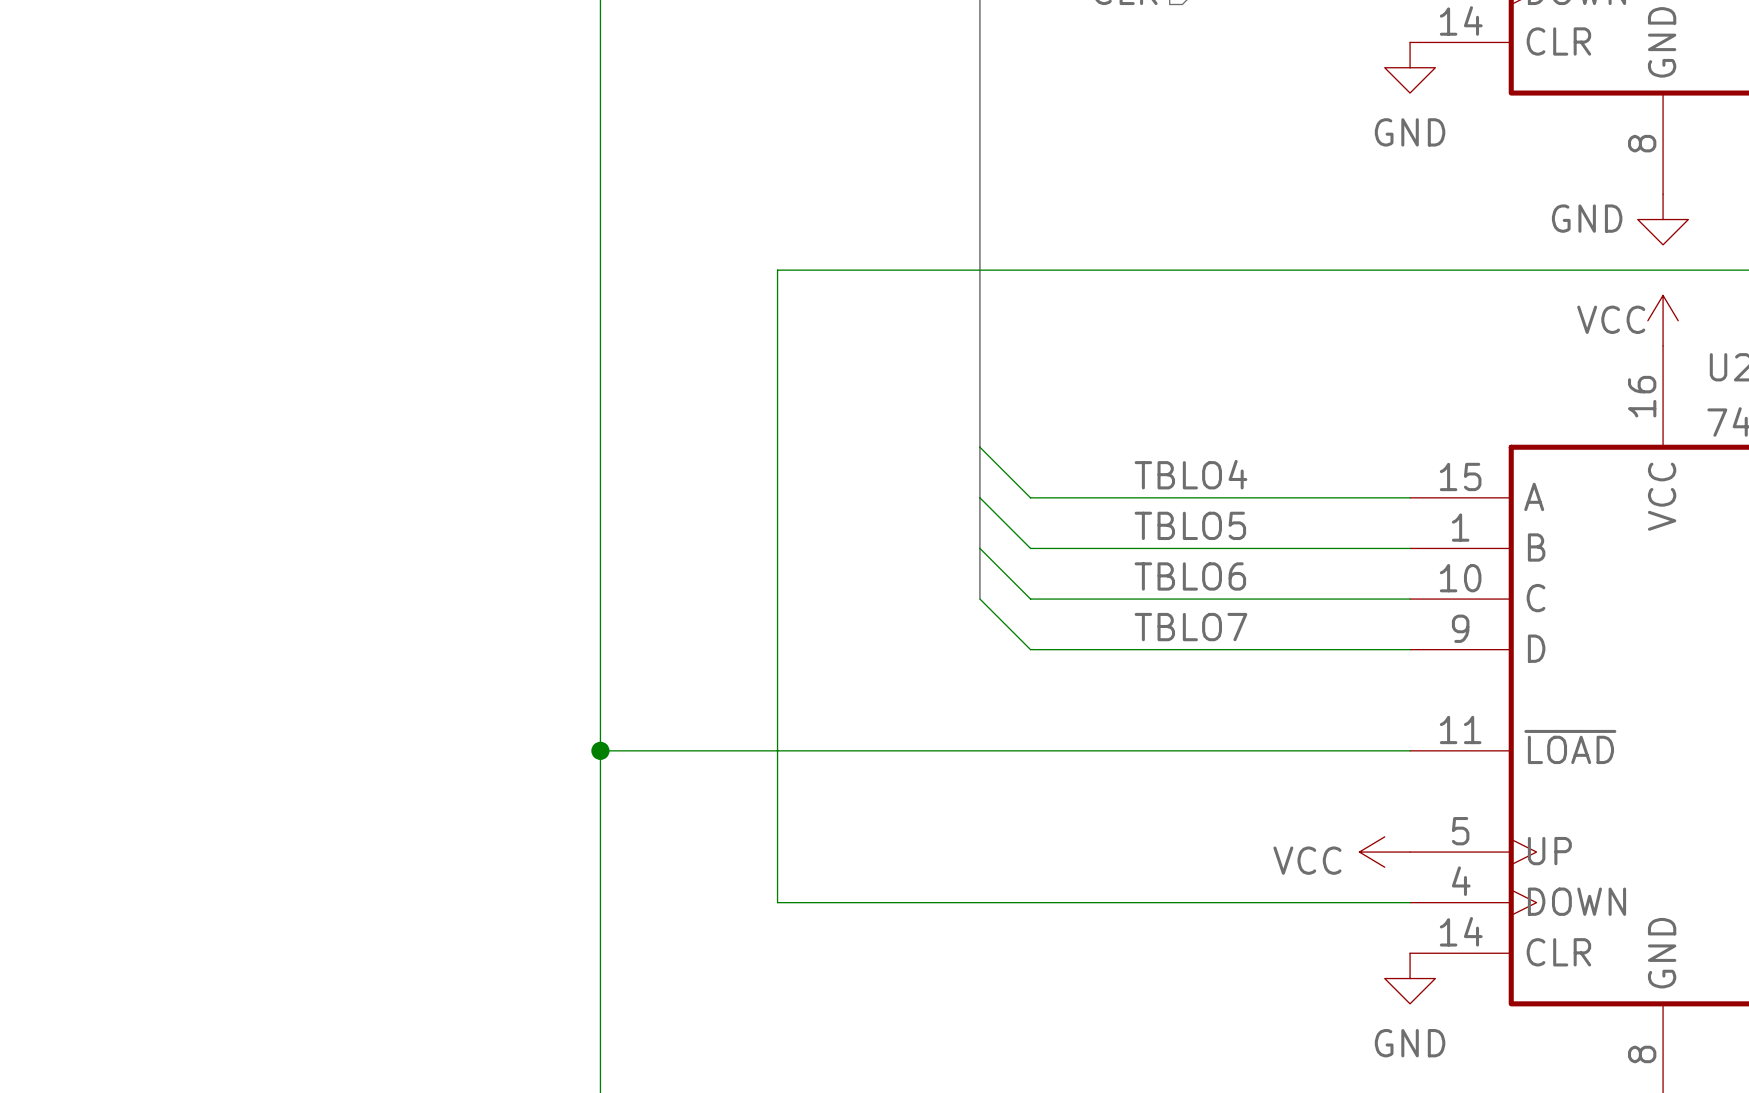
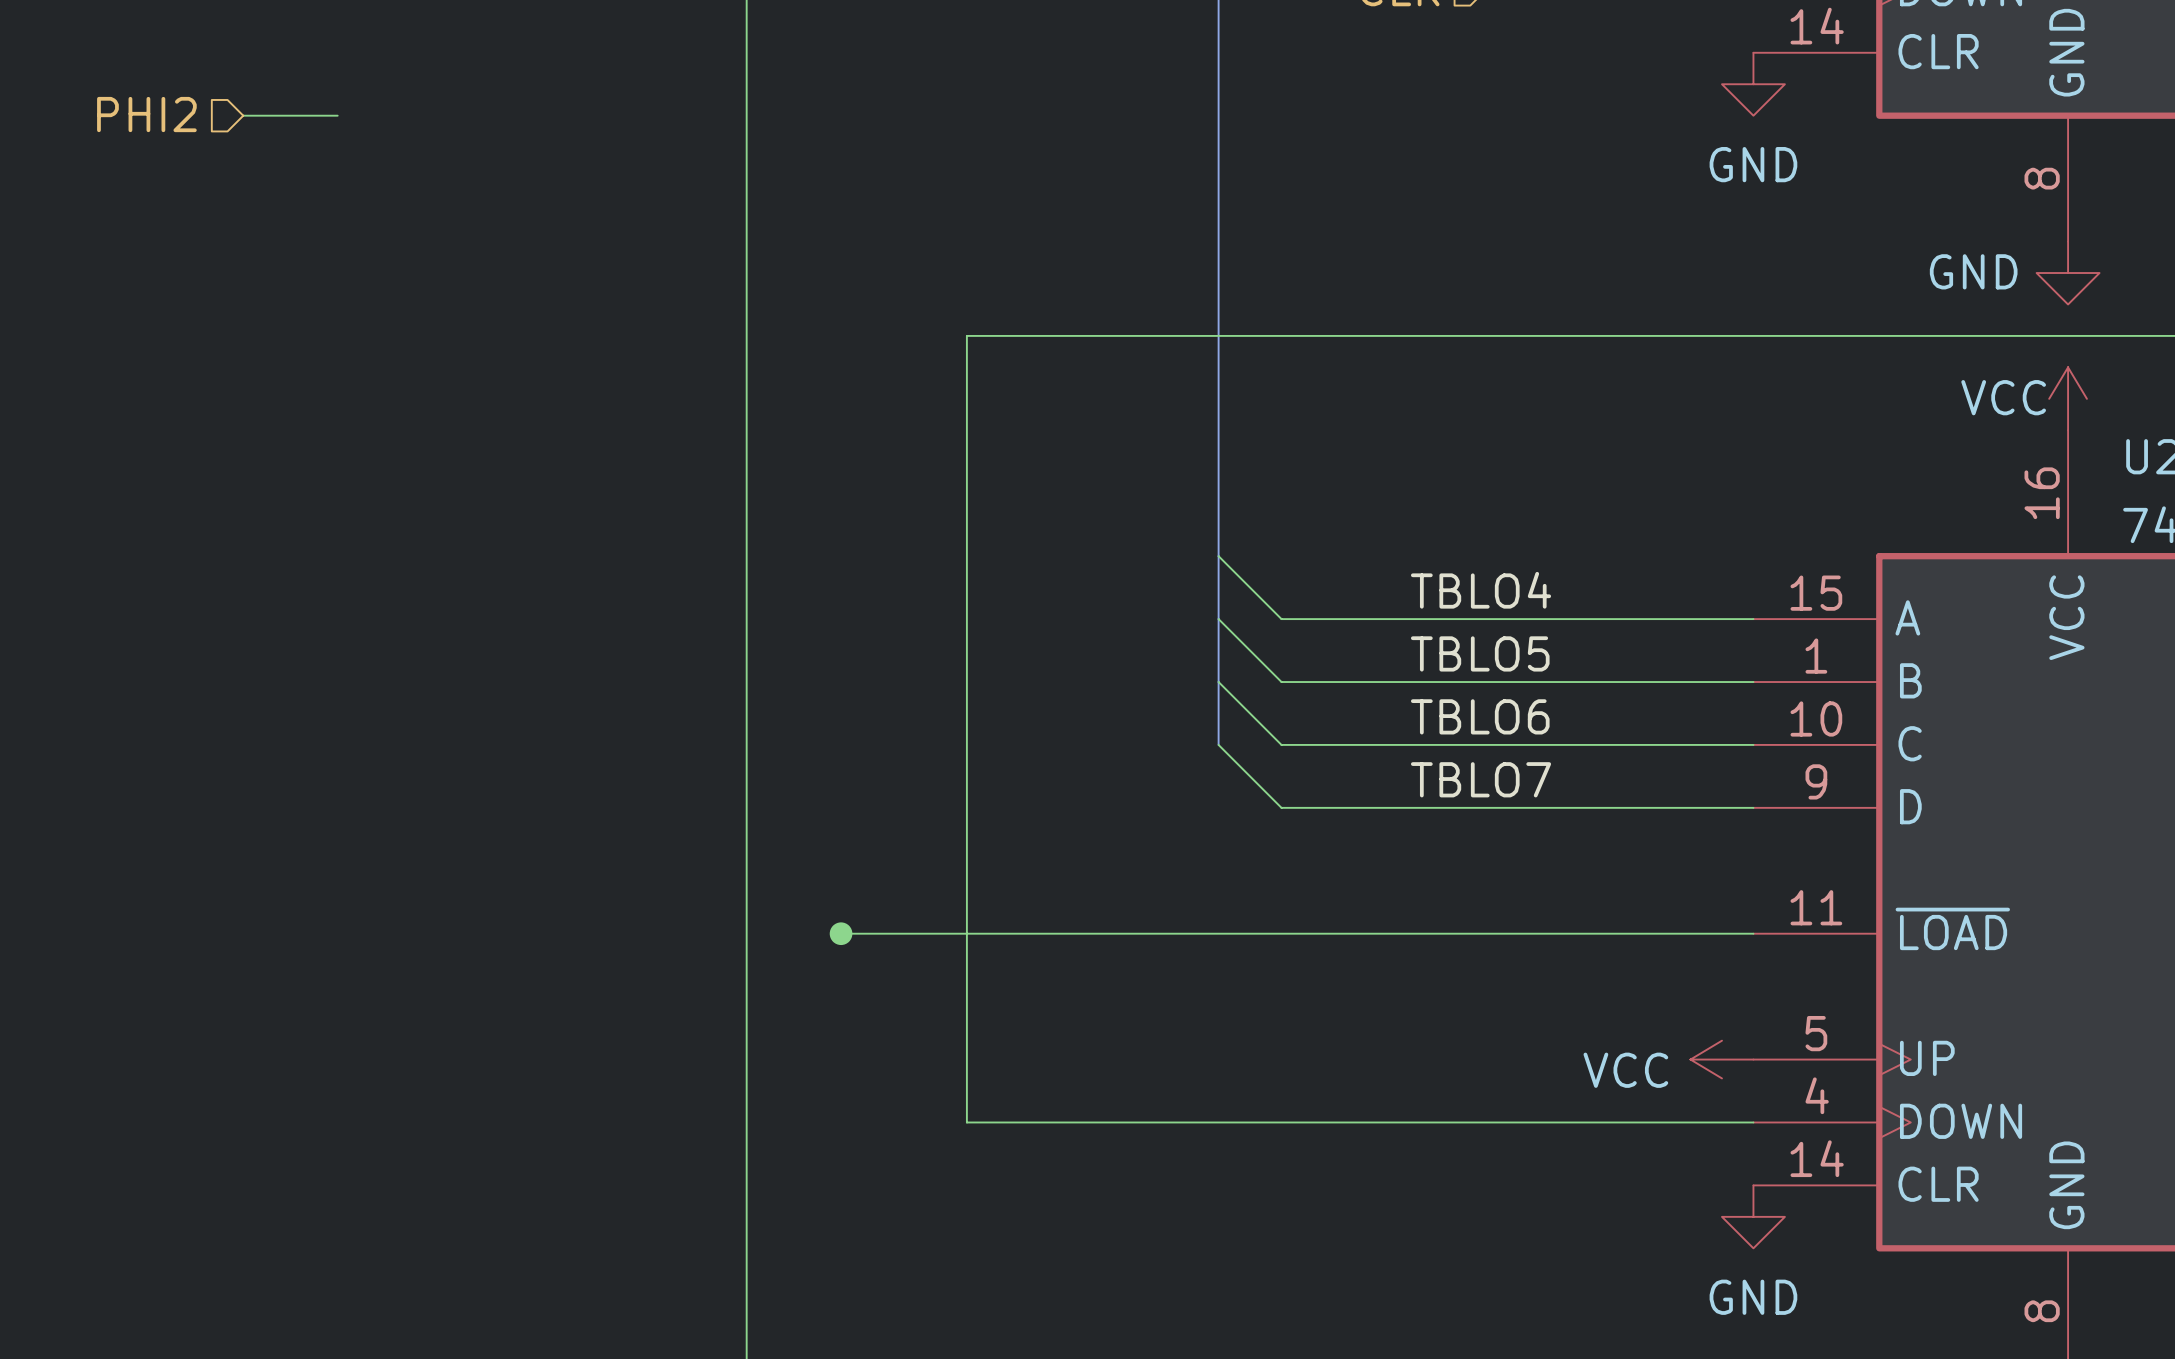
hierarchical label: none -> PHI2 (146, 114)
wire: none -> (243, 115) (337, 115)
wire: (600, 750) (676, 750) -> none
junction position: (600, 750) -> (841, 933)

